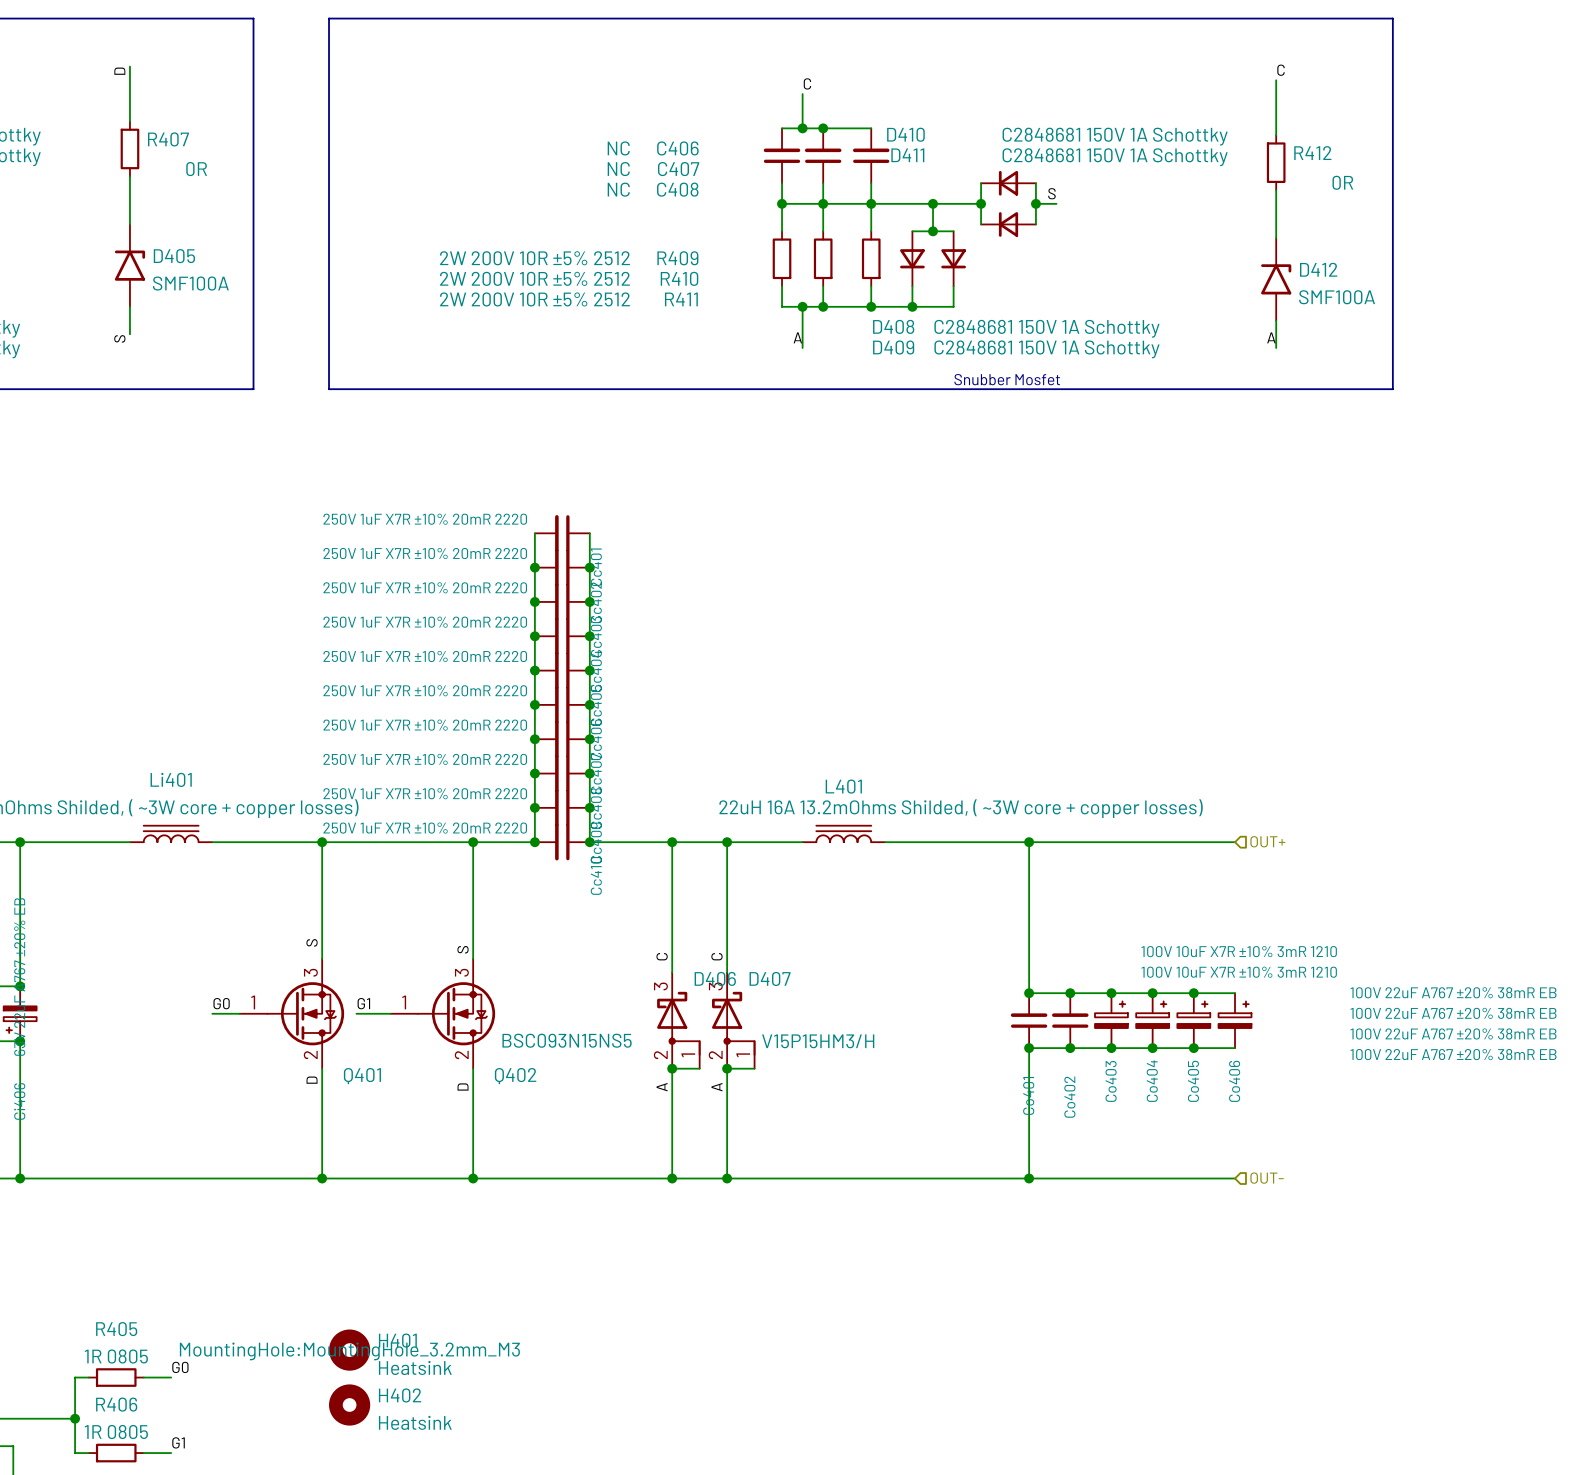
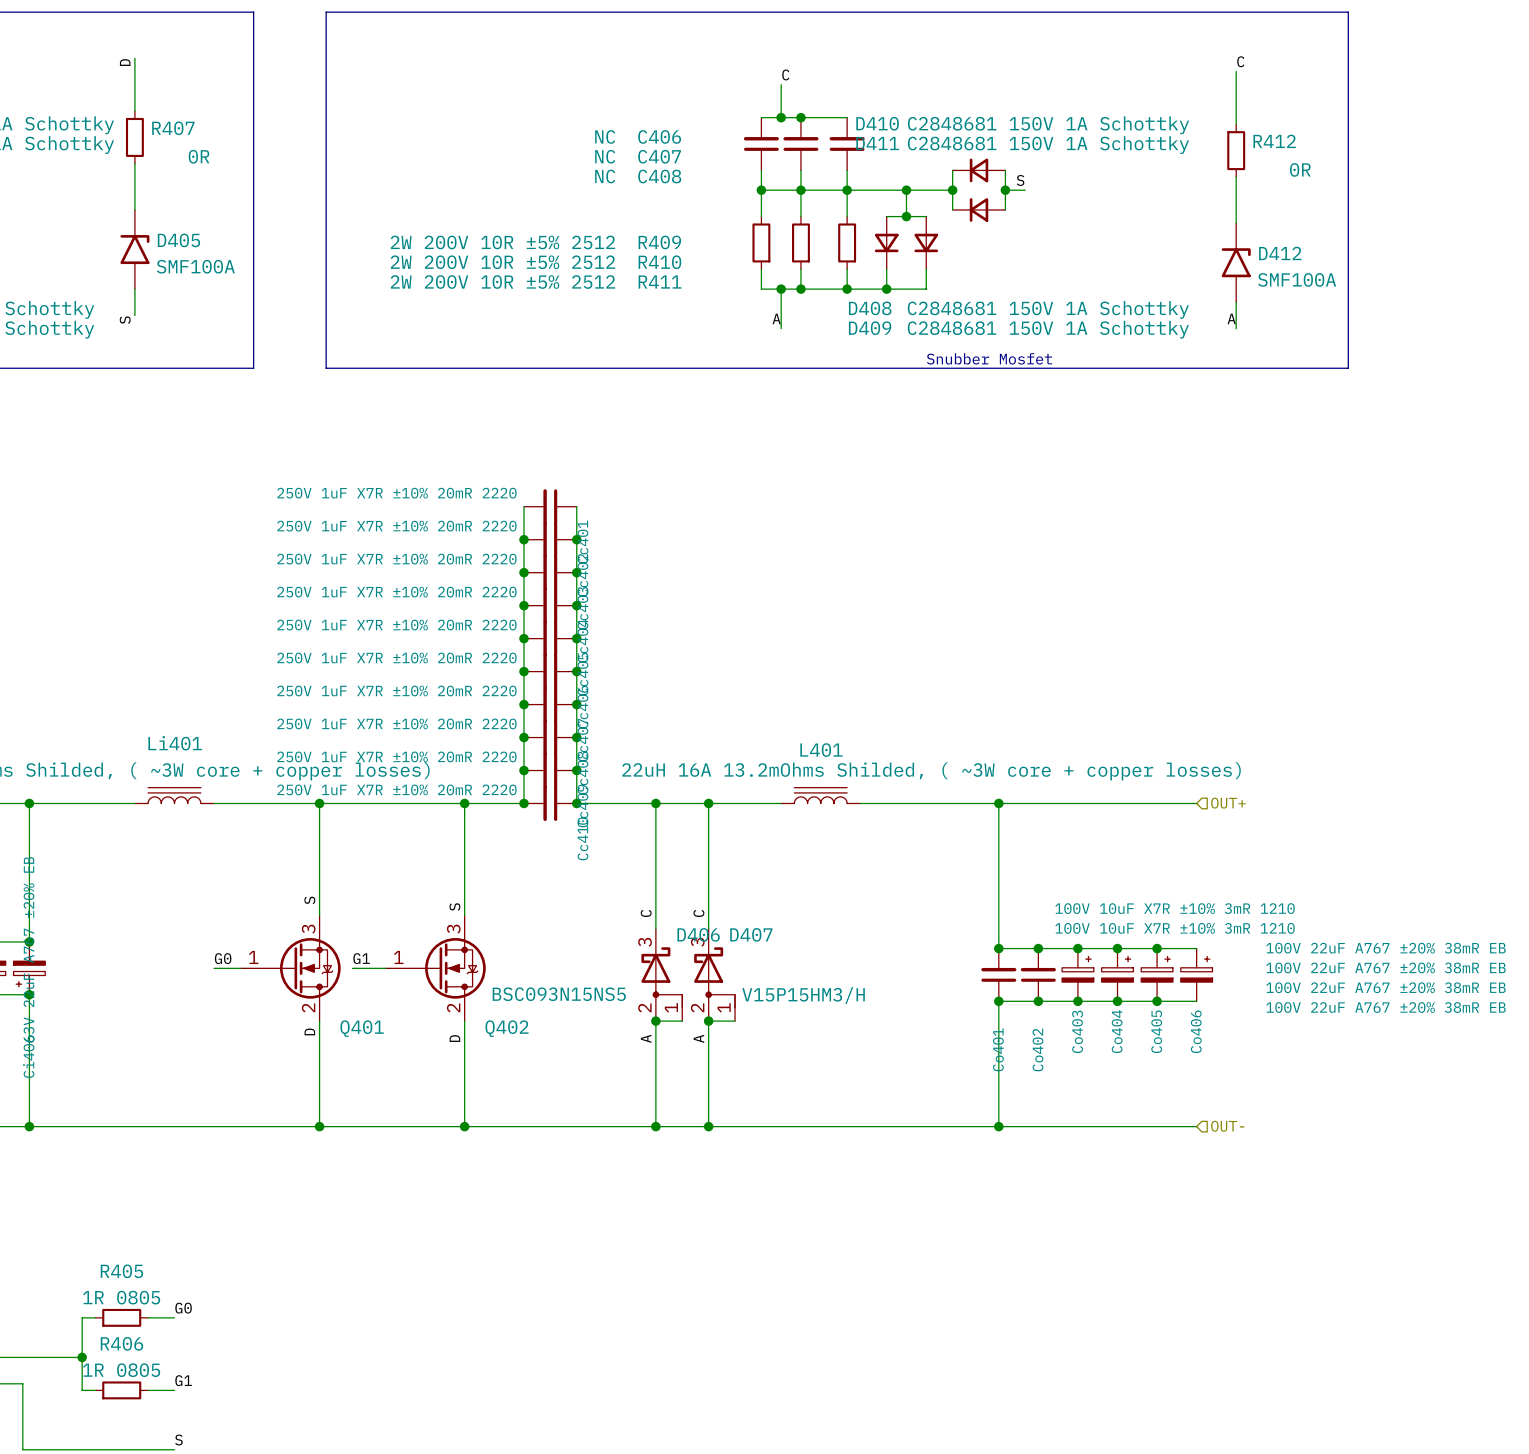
H401: Heatsink (349, 1350) -> none
H402: Heatsink (349, 1405) -> none

